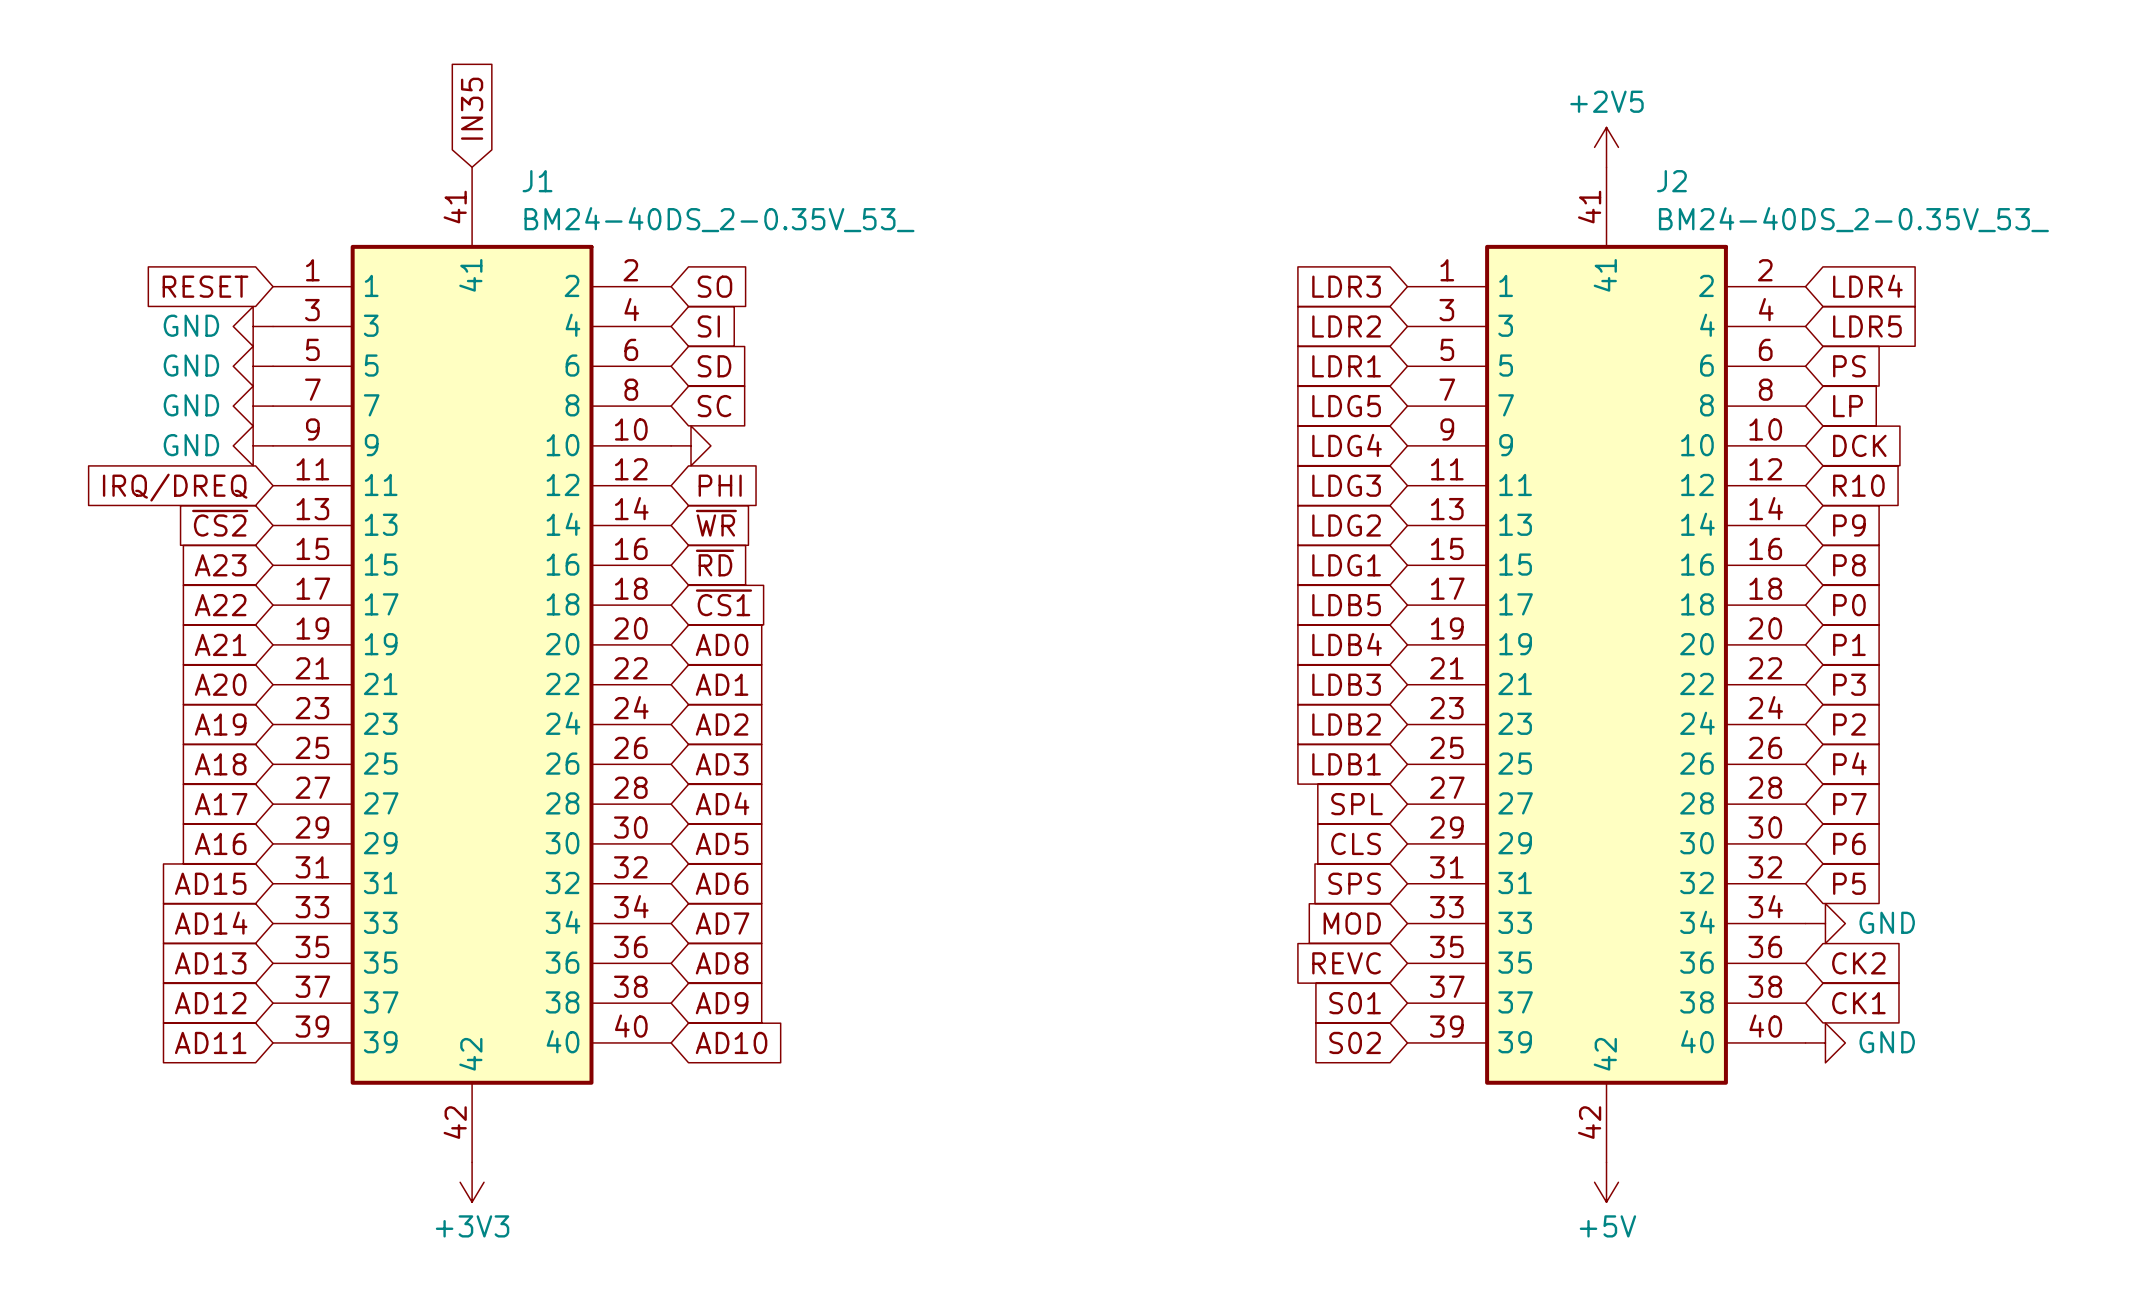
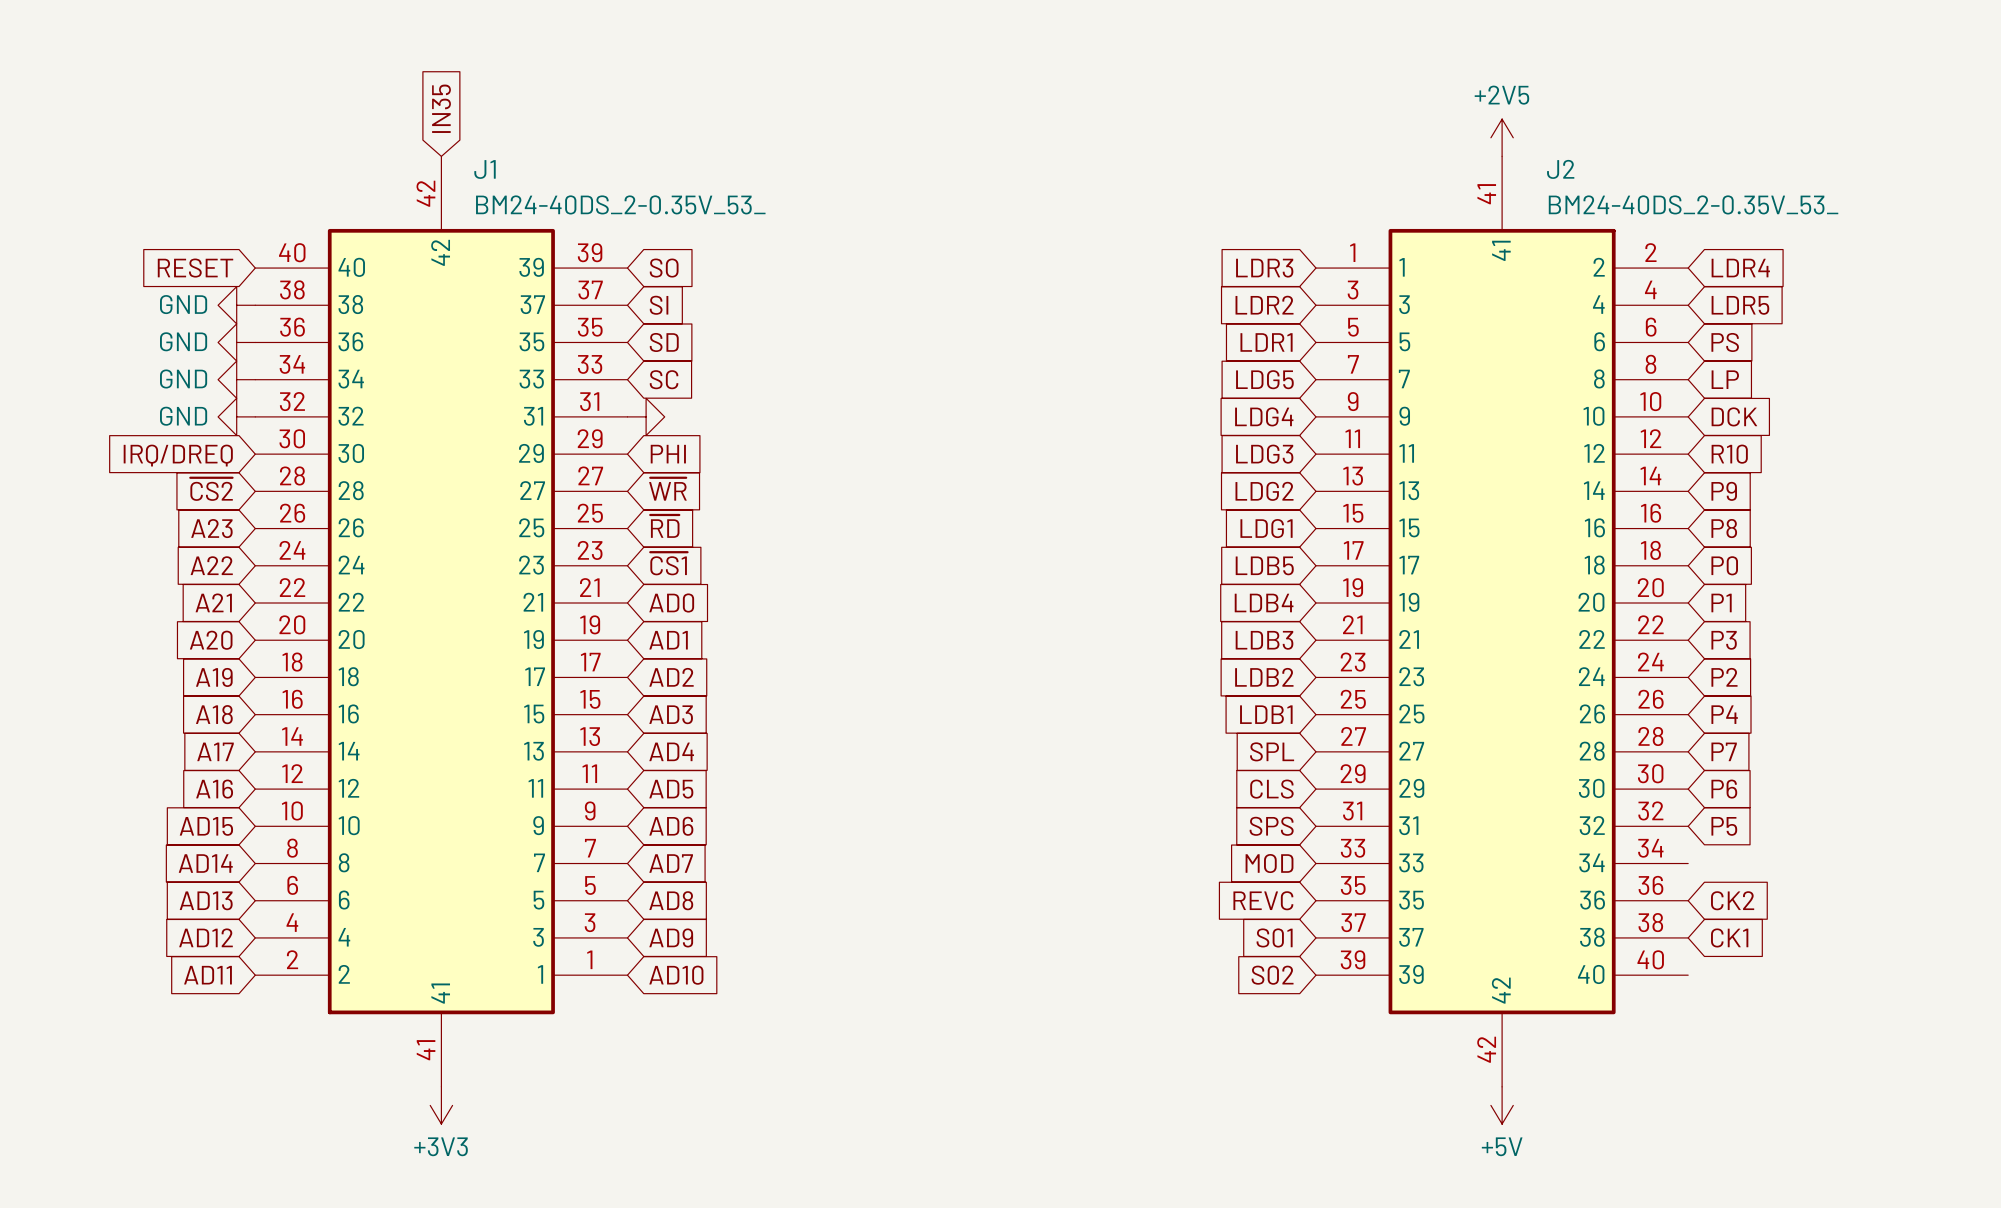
J1 rotation: 0° (472, 664) -> 180° (441, 621)
power symbol: GND (1825, 923) -> none
power symbol: GND (1825, 1042) -> none

